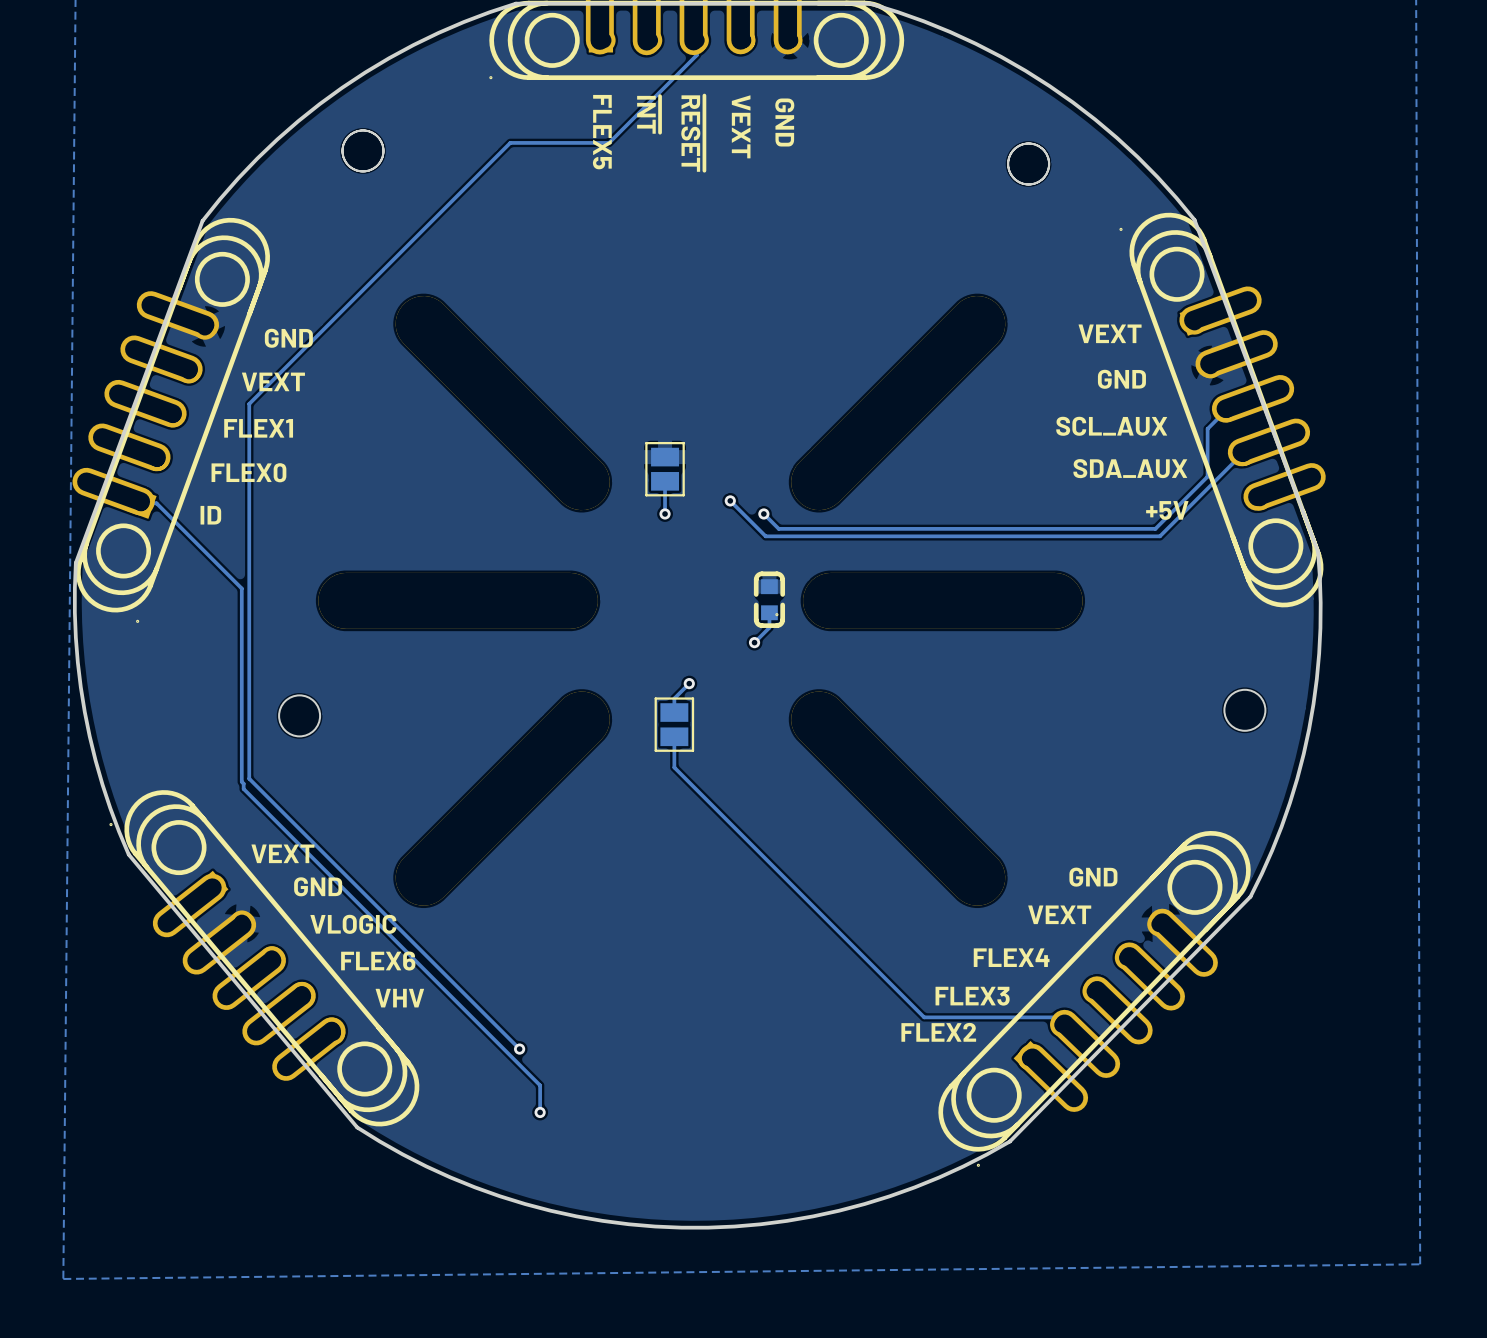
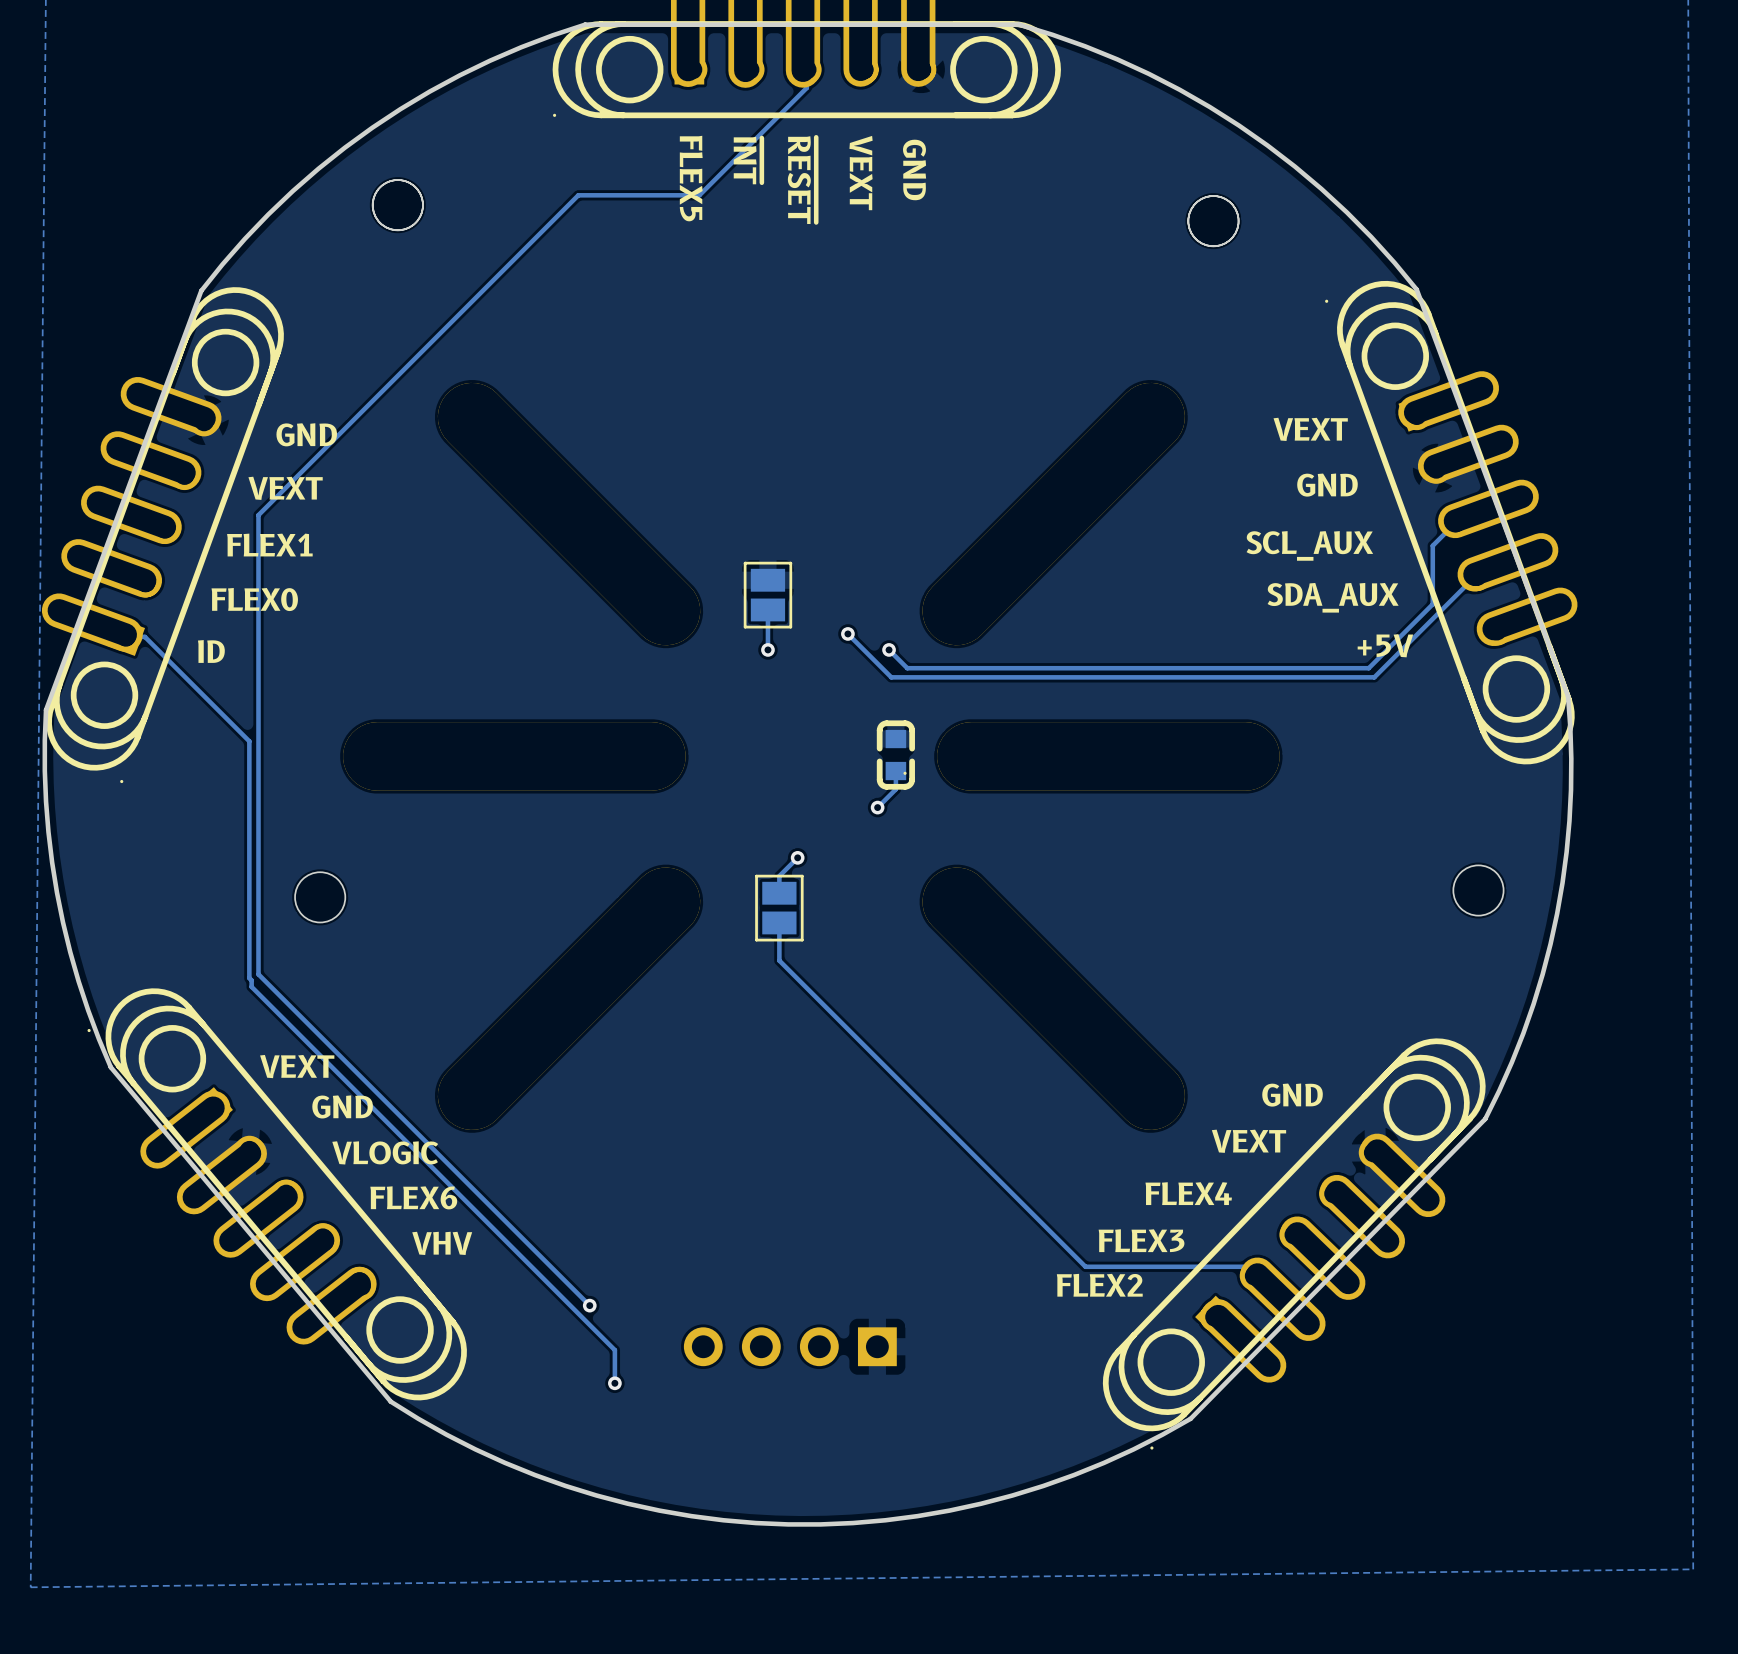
part: none -> (790, 1346)

